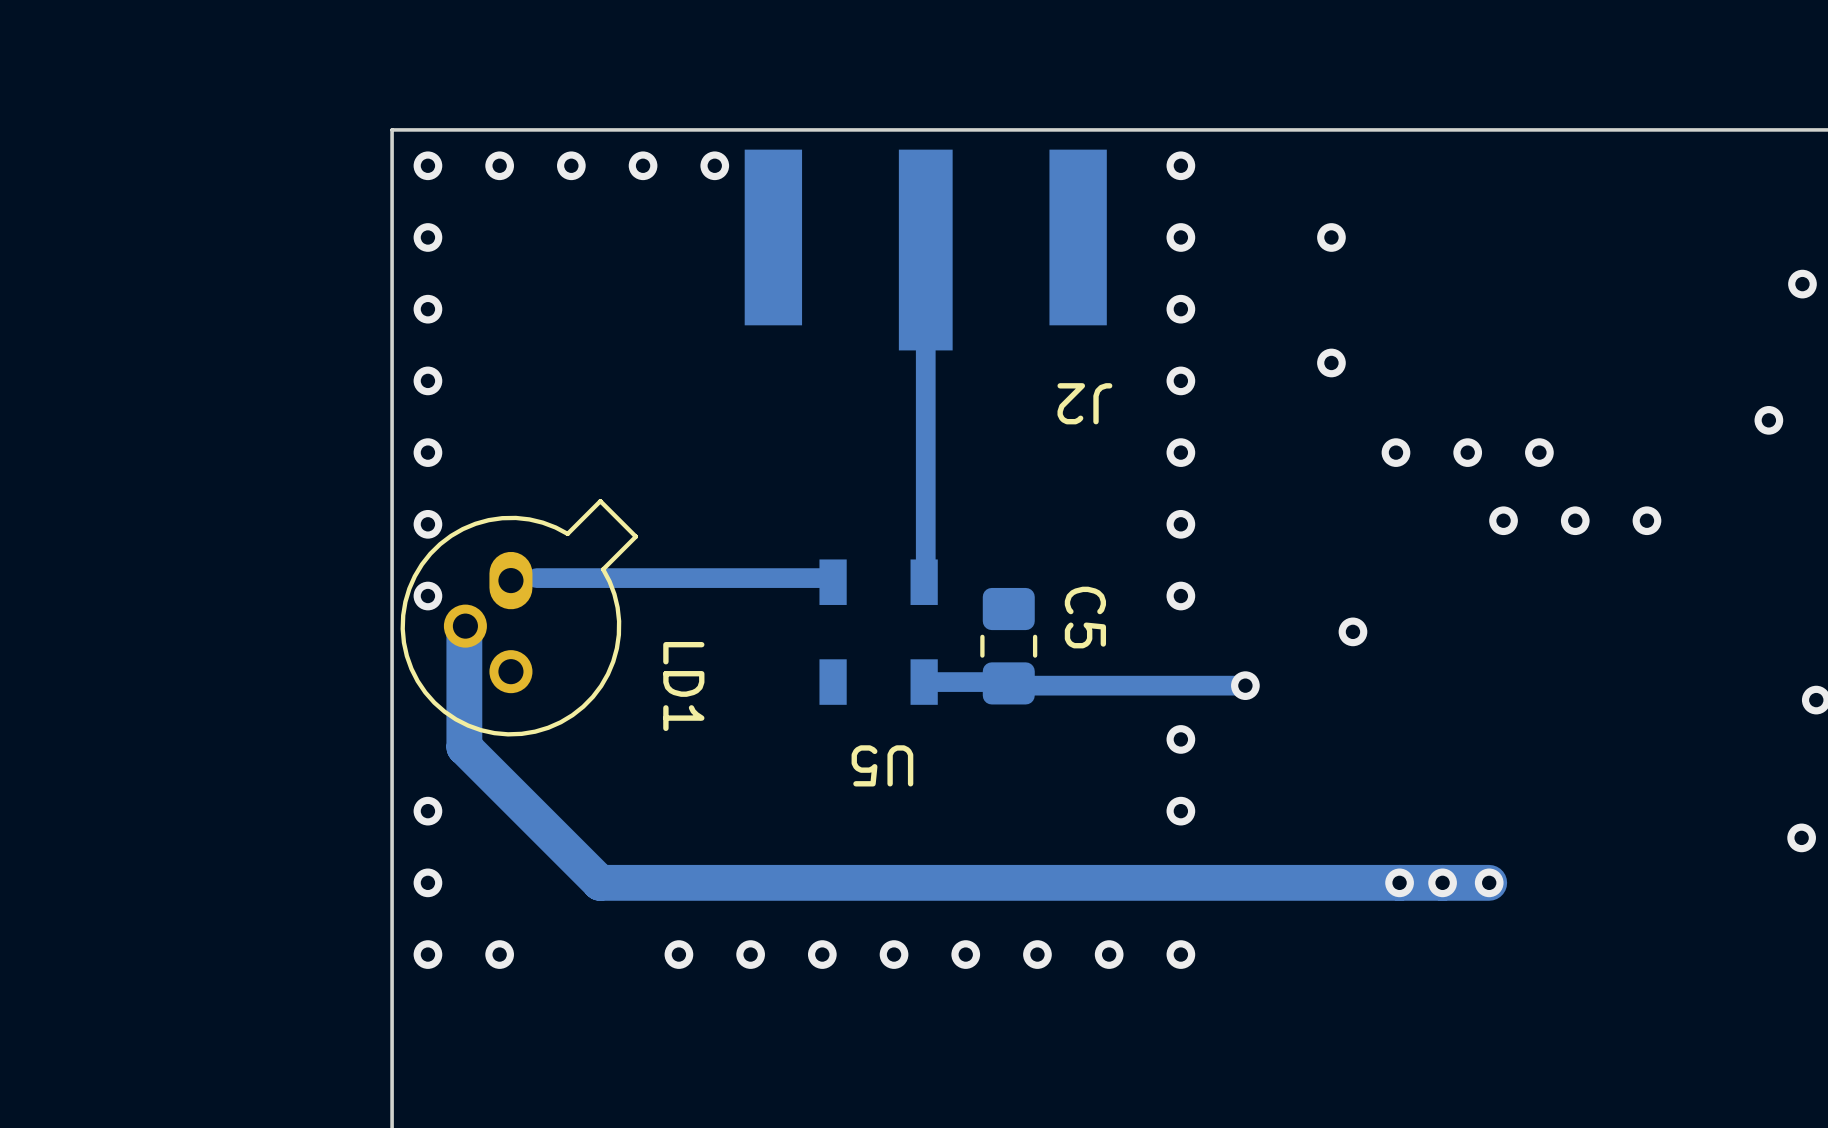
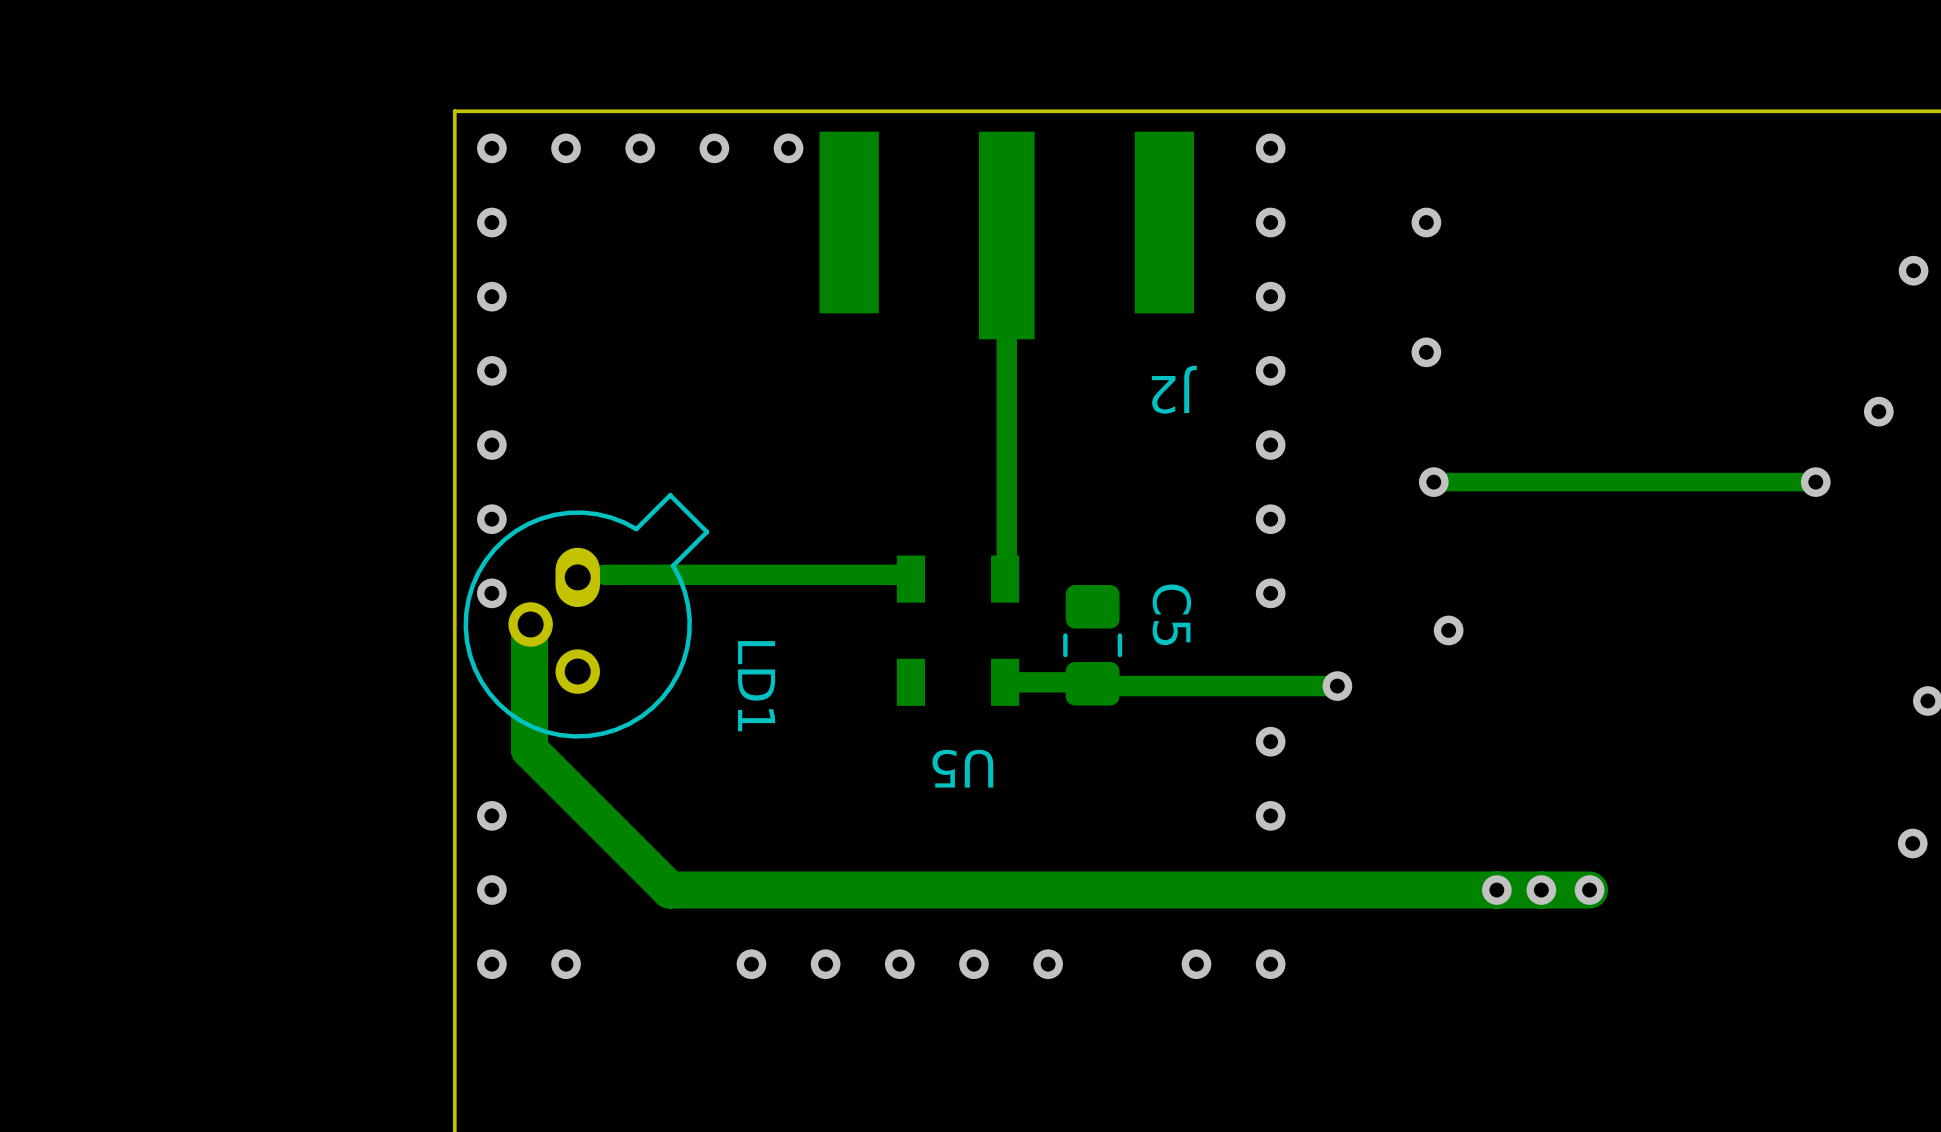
via: (1395, 452) -> none
via: (1467, 452) -> none
via: (1539, 452) -> none
via: none -> (1433, 482)
track: none -> (1815, 482) (1433, 482)
via: none -> (1815, 482)
via: (1503, 520) -> none
via: (1575, 520) -> none
via: (1646, 520) -> none
via: (1037, 954) -> none

